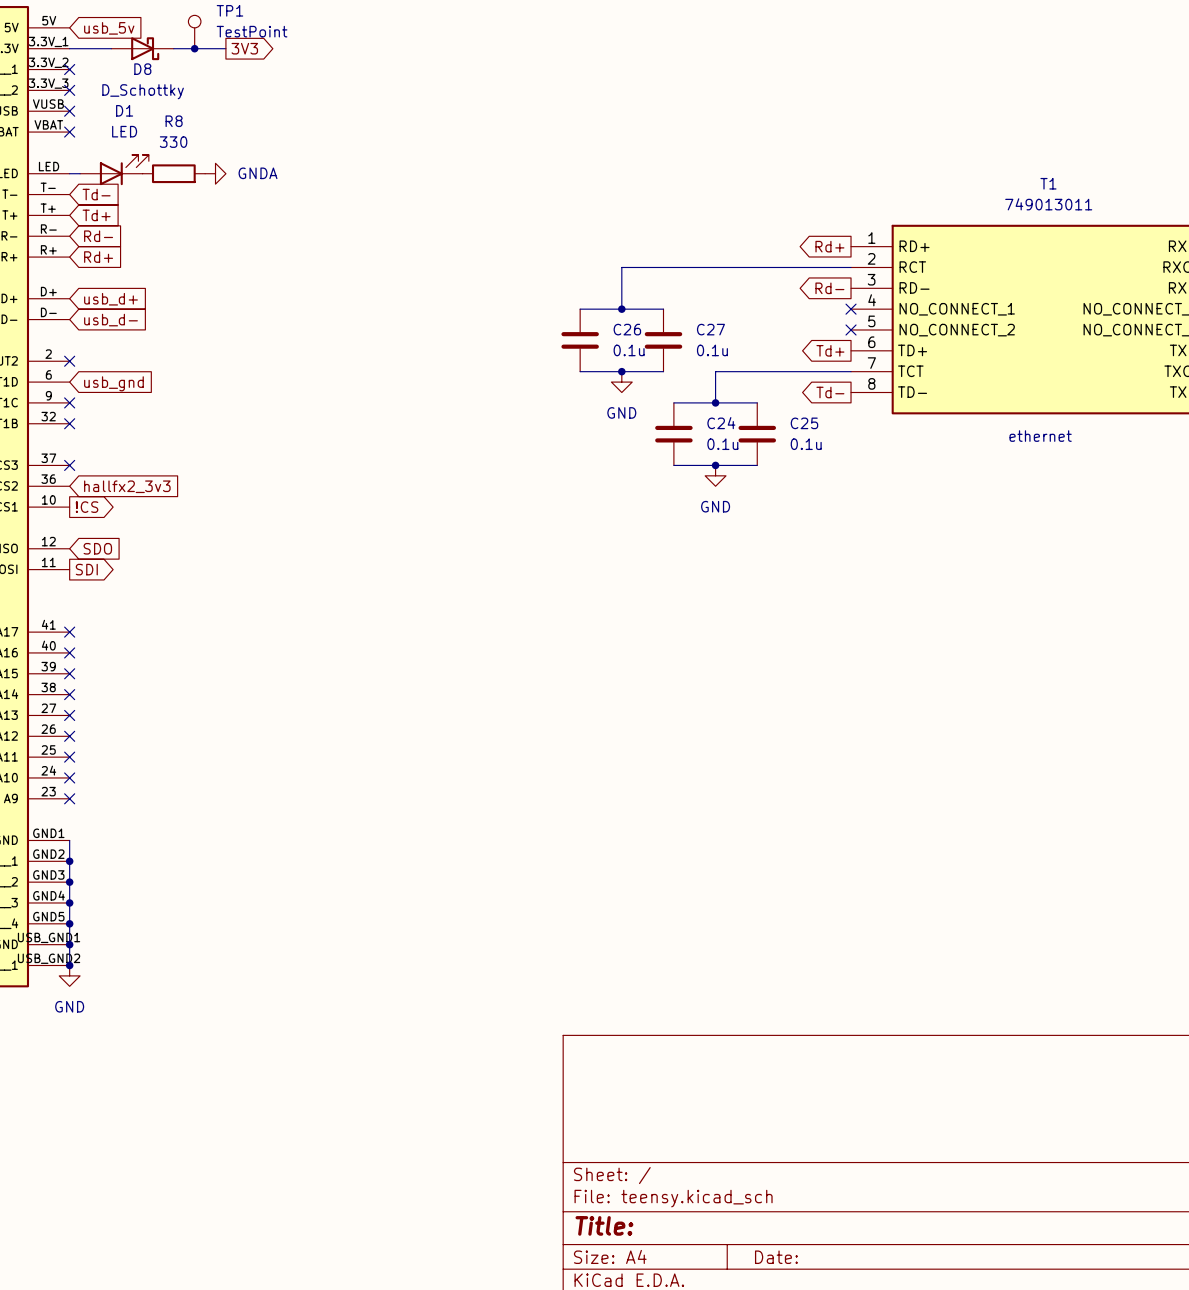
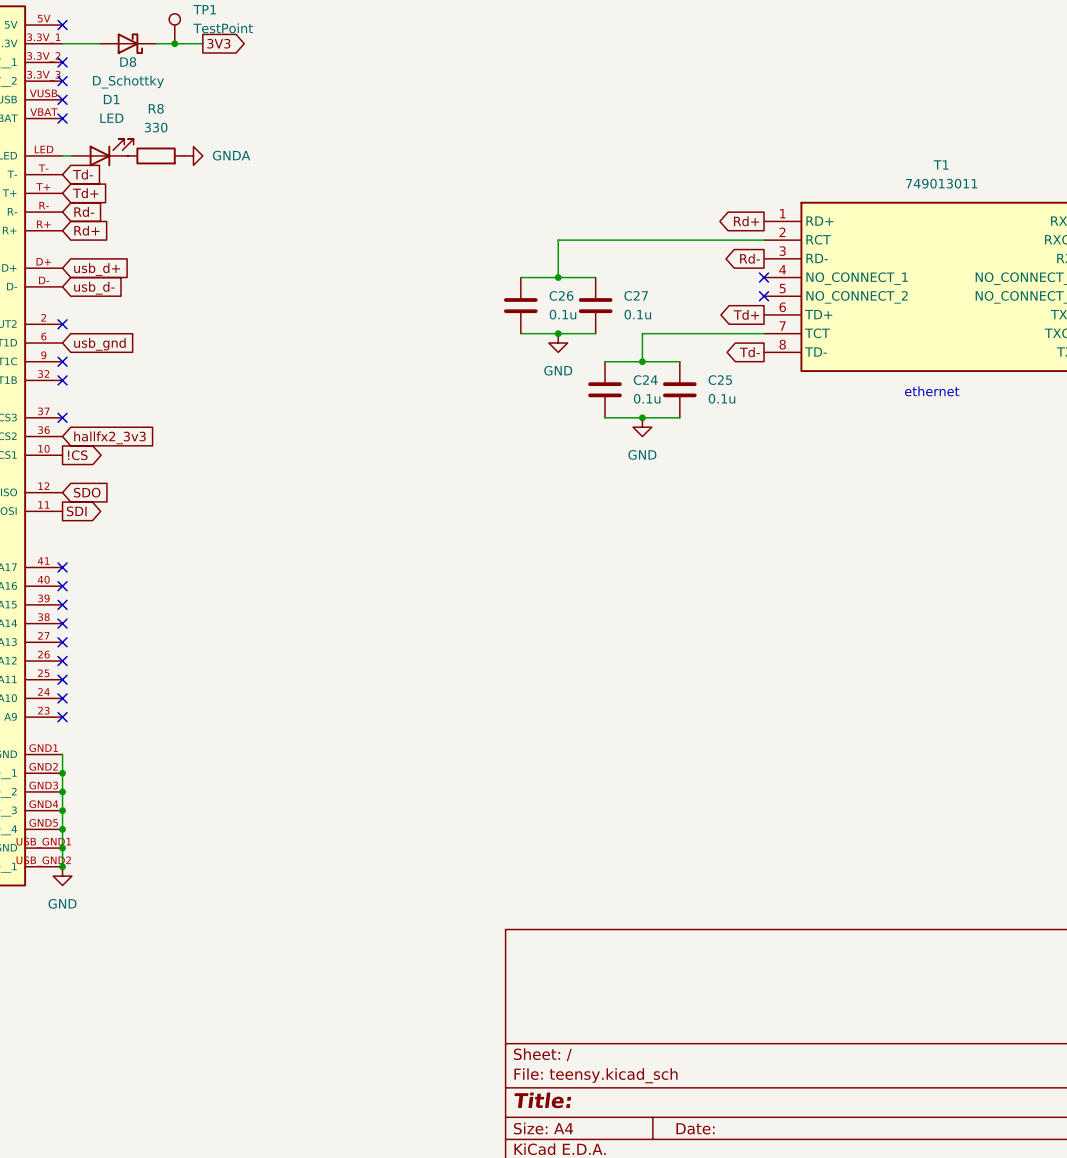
no-connect mark: none -> (62, 25)
global label: usb_5v (109, 28) -> none

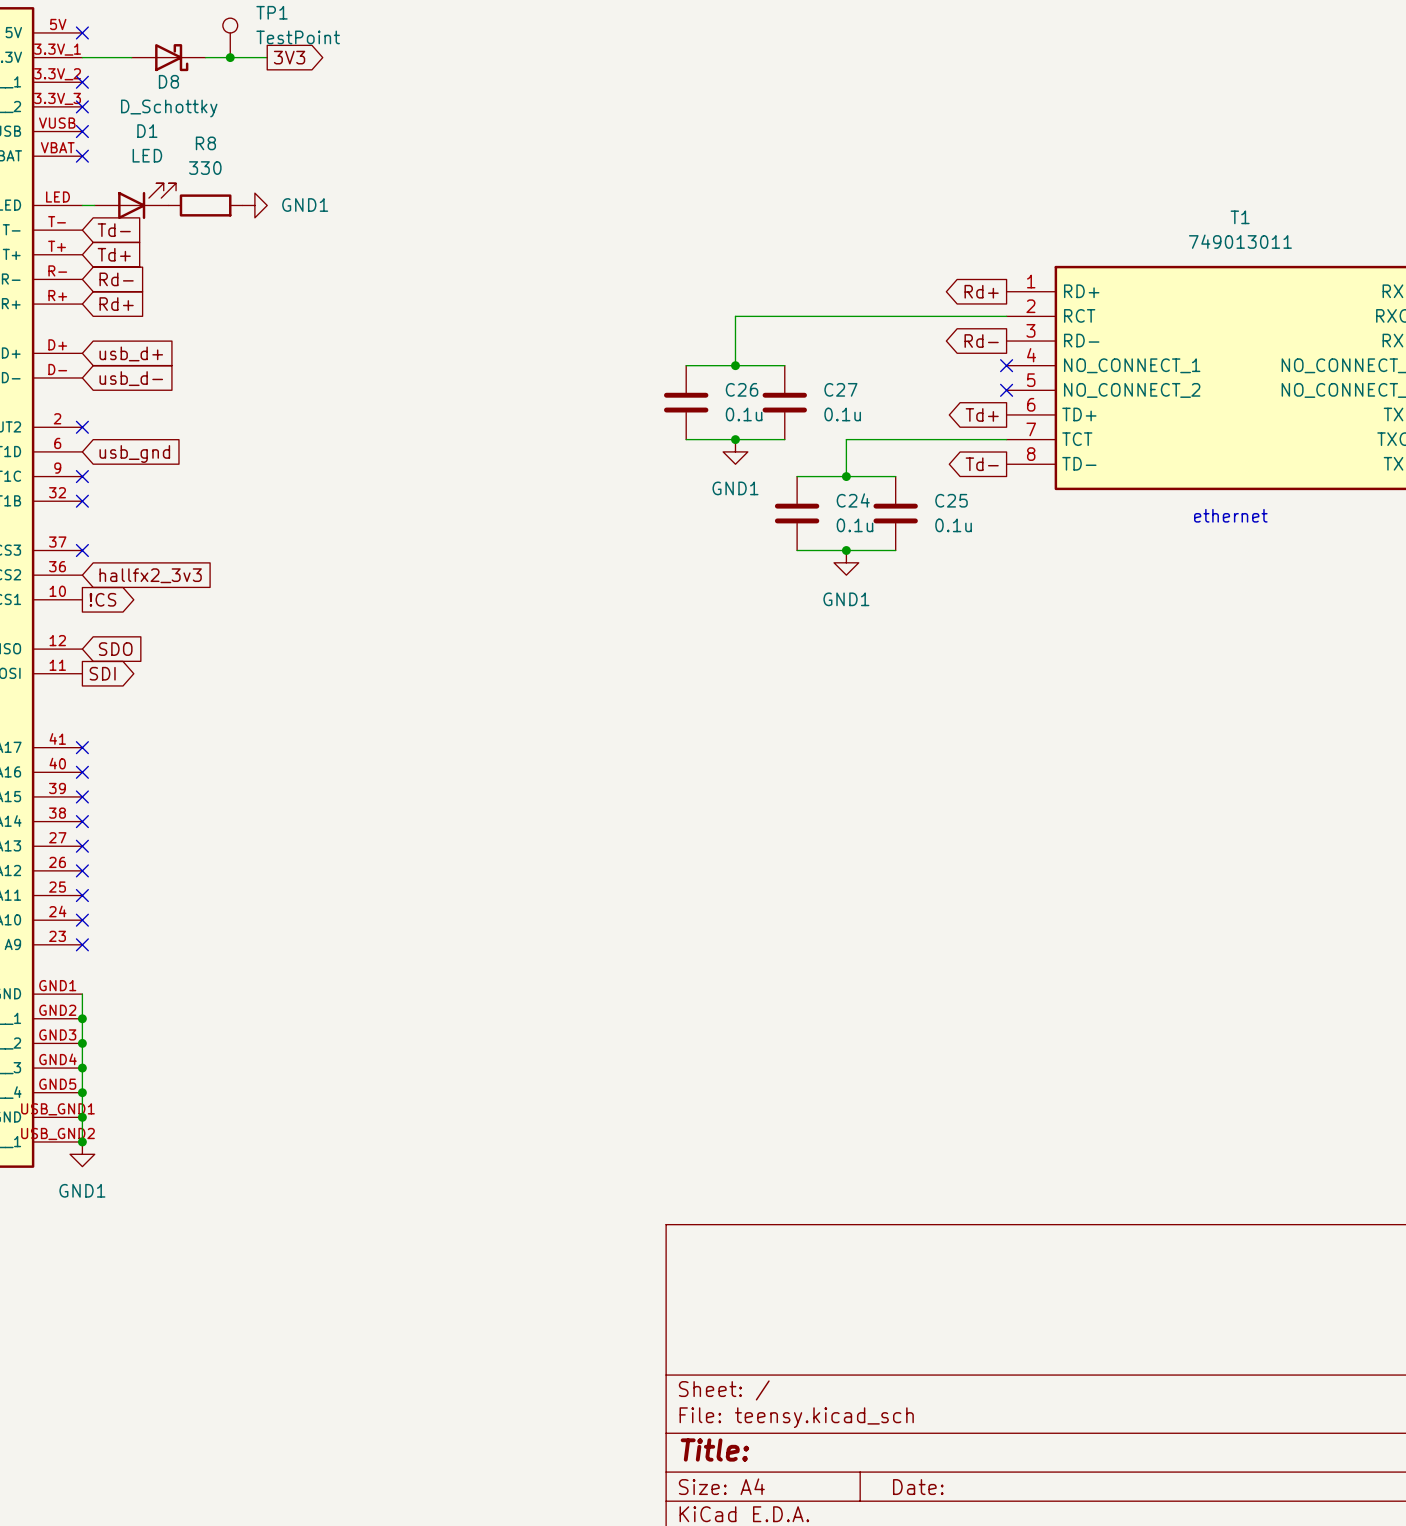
power symbol: GNDA (193, 155) -> GND1 (254, 205)
power symbol: GND (558, 343) -> GND1 (735, 451)
power symbol: GND (642, 427) -> GND1 (846, 562)
power symbol: GND (62, 876) -> GND1 (82, 1154)

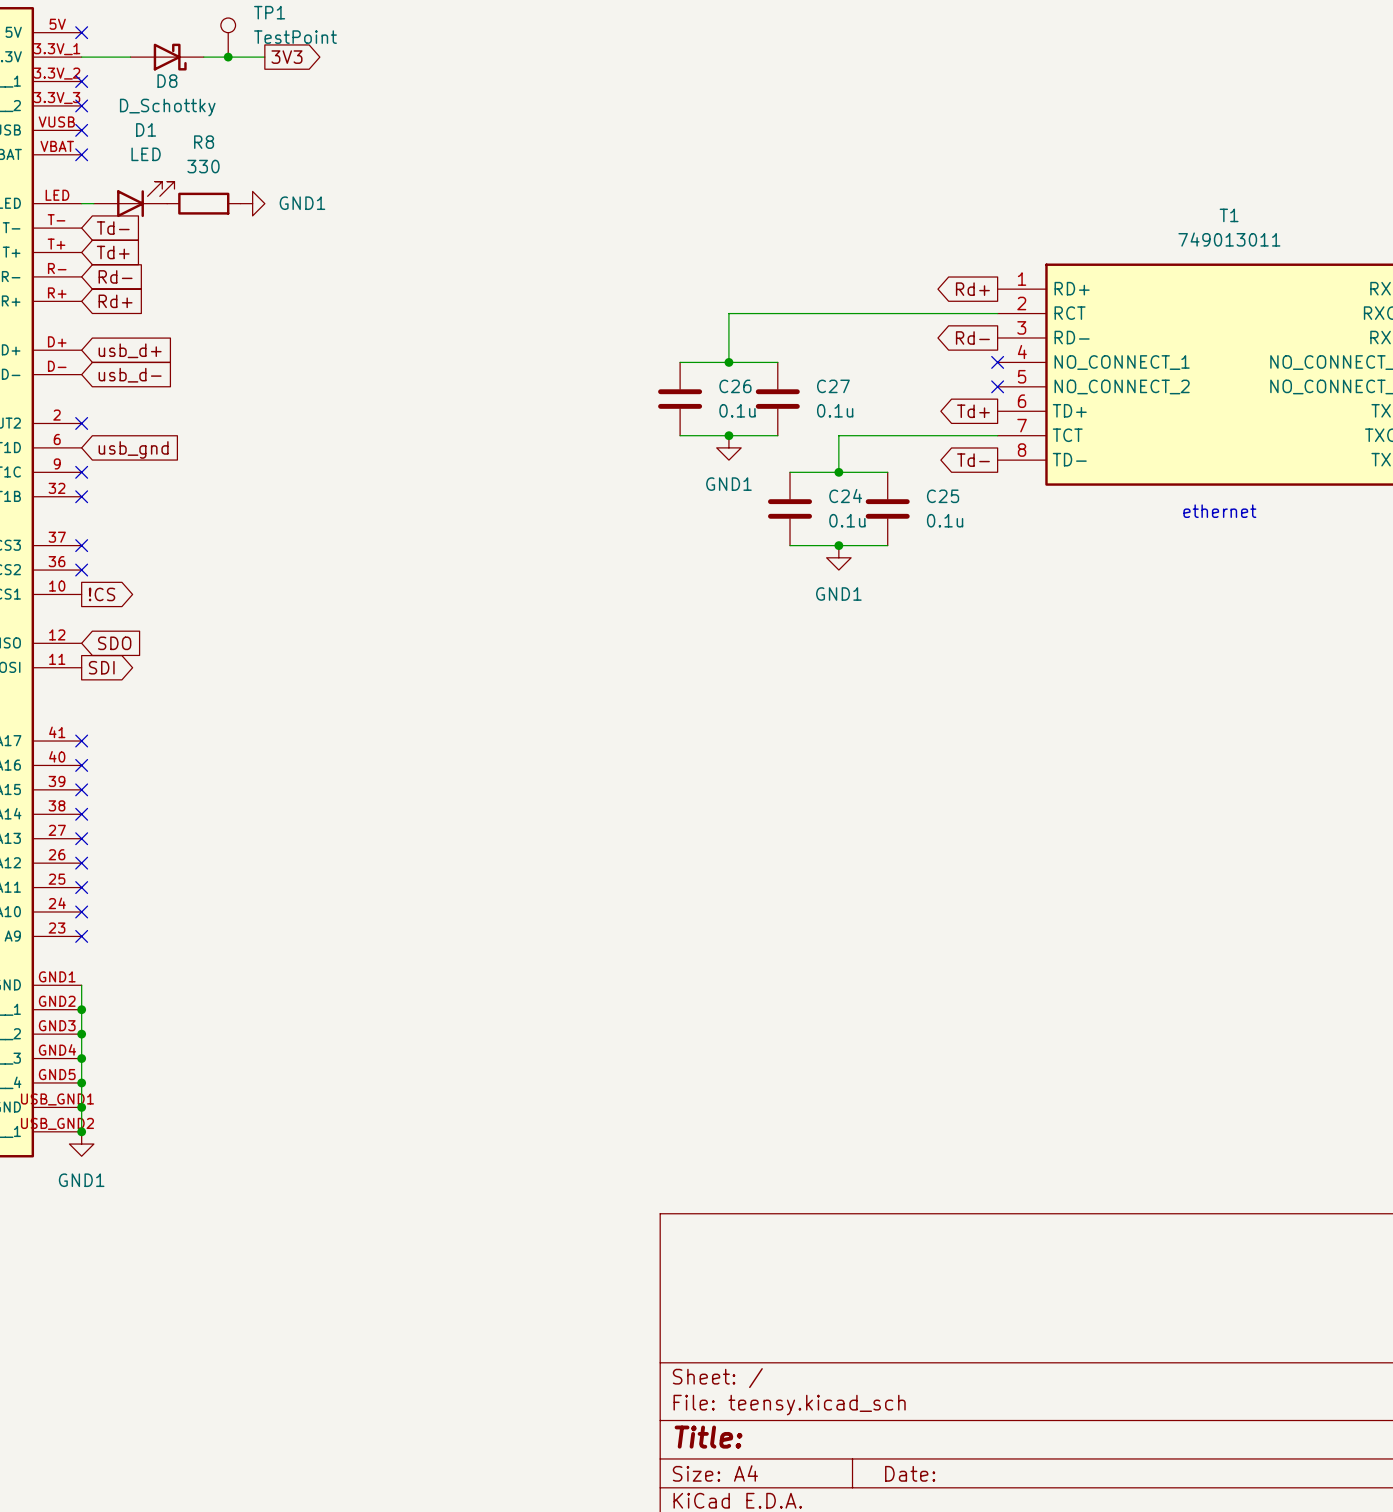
no-connect mark: none -> (81, 570)
global label: hallfx2_3v3 (150, 575) -> none

